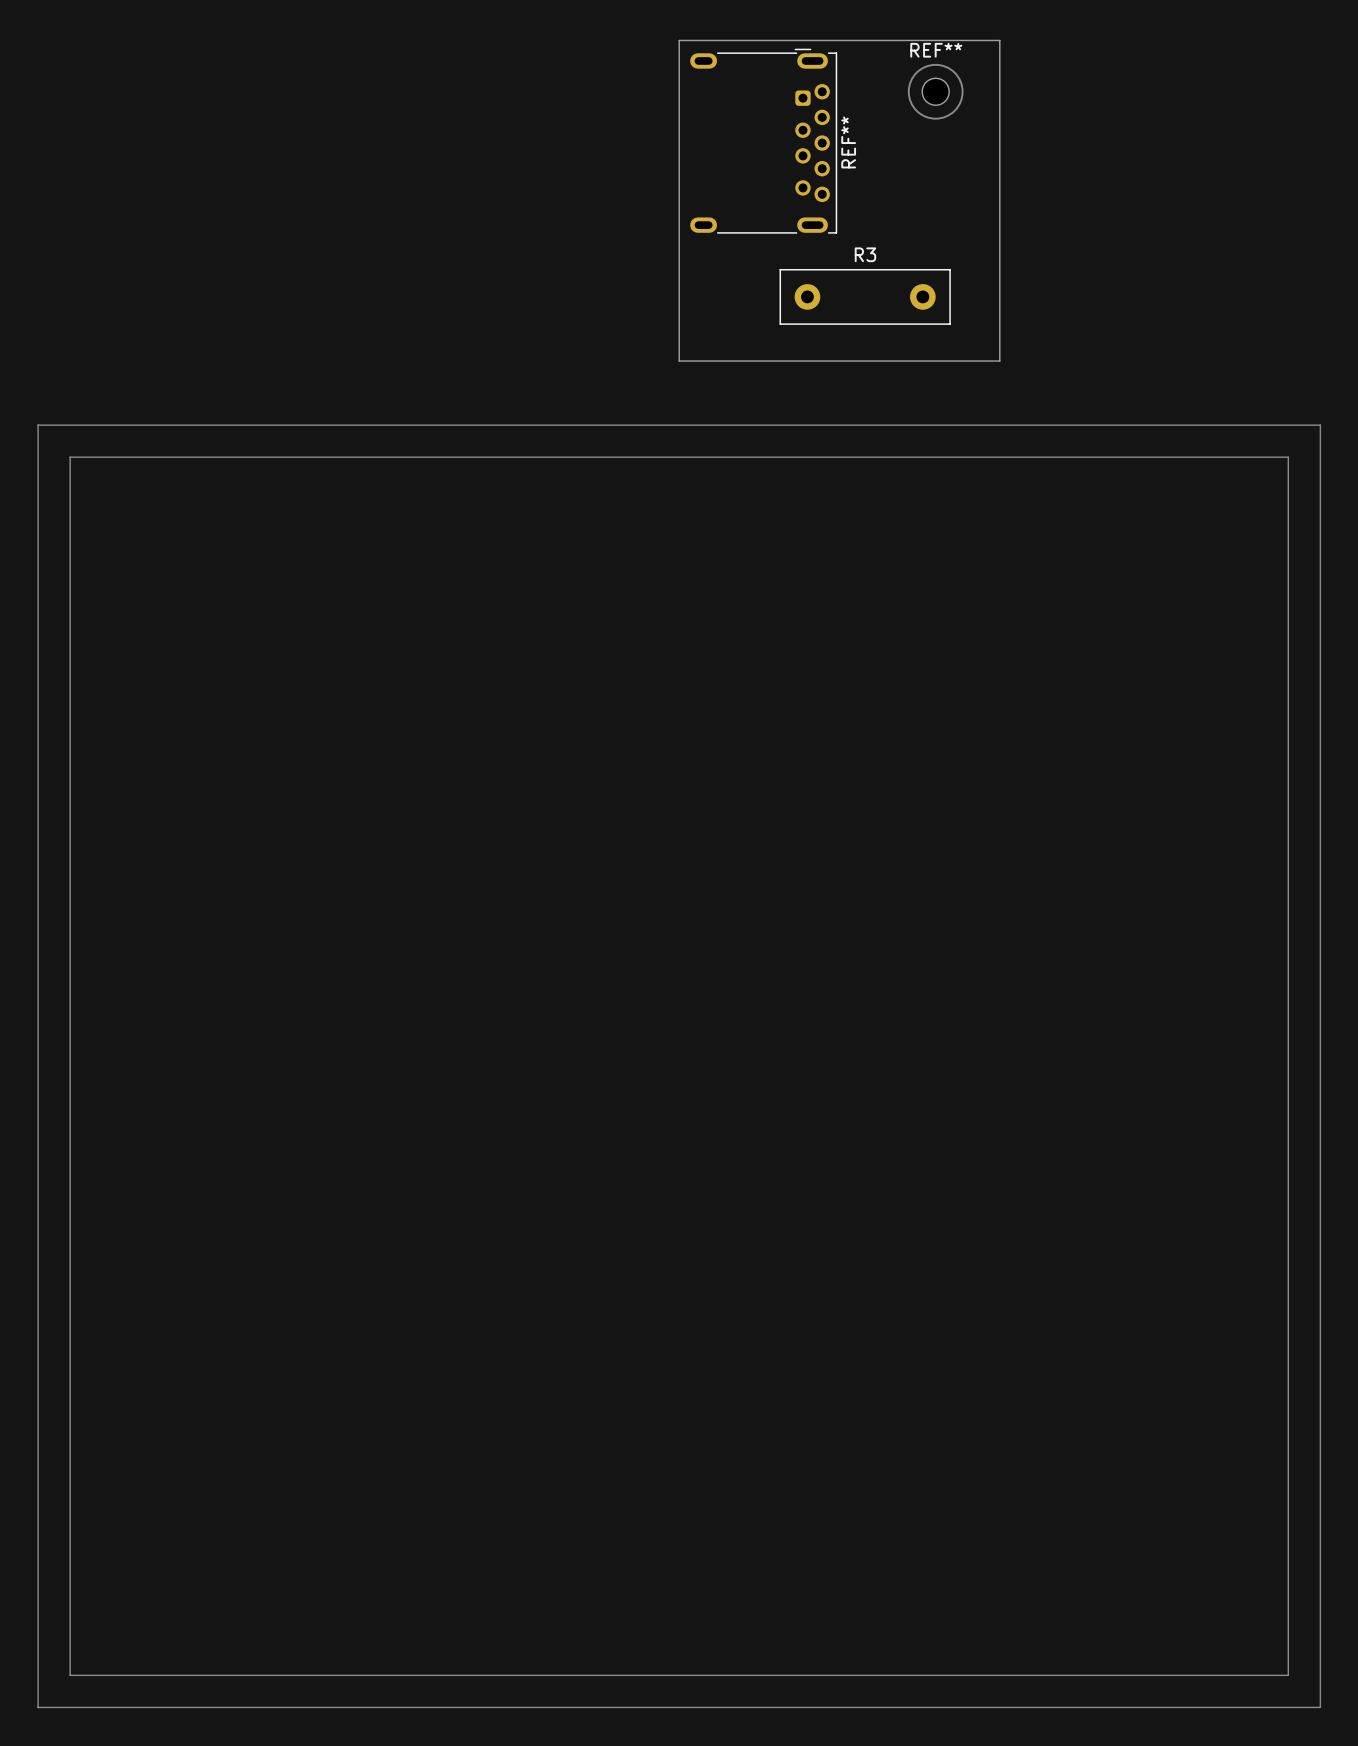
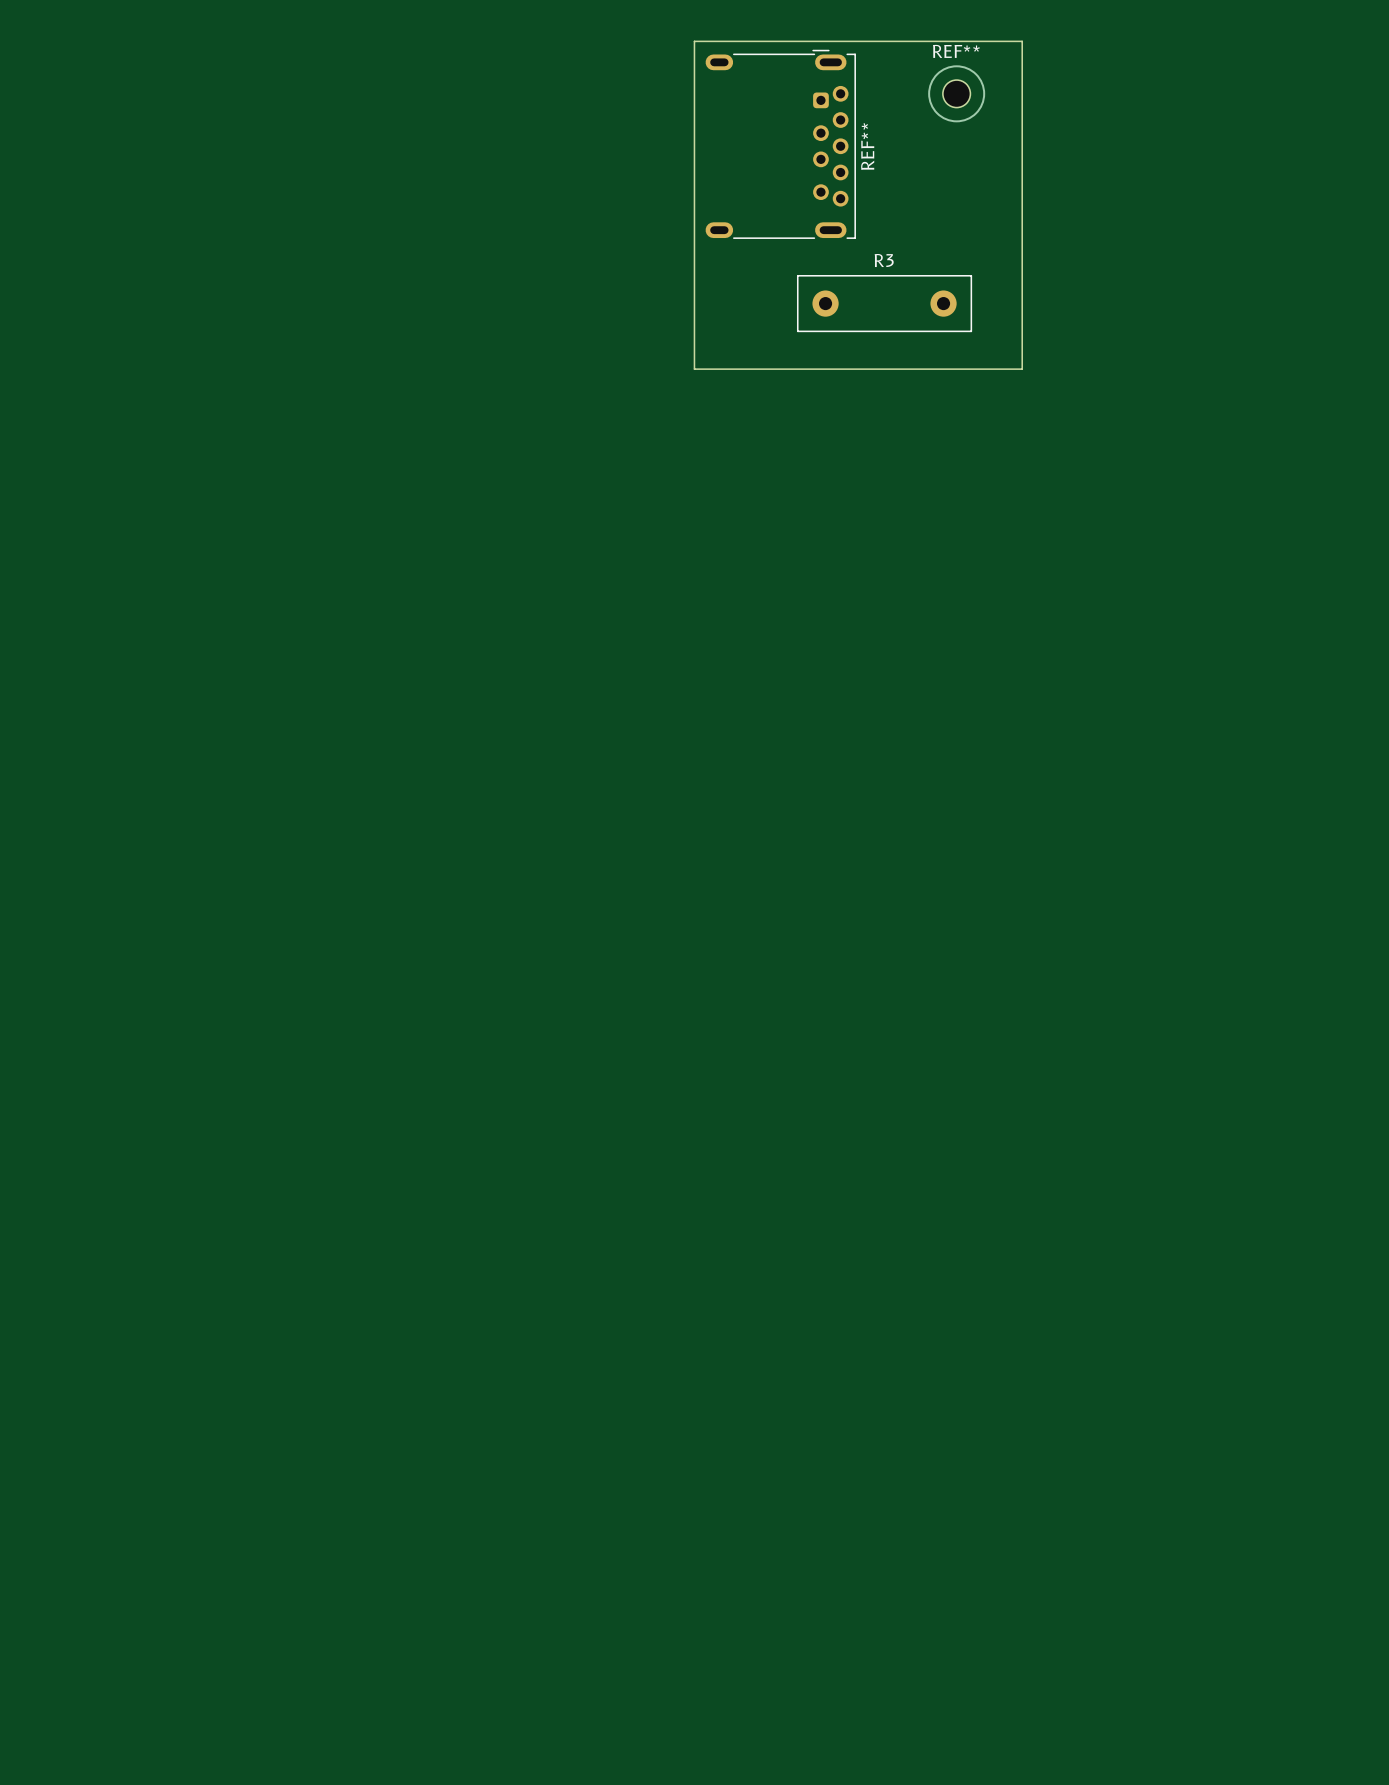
line: (38, 425) (1320, 425) (1320, 1707) (38, 1707) (38, 425) -> none
line: (70, 457) (1288, 457) (1288, 1675) (70, 1675) (70, 457) -> none

